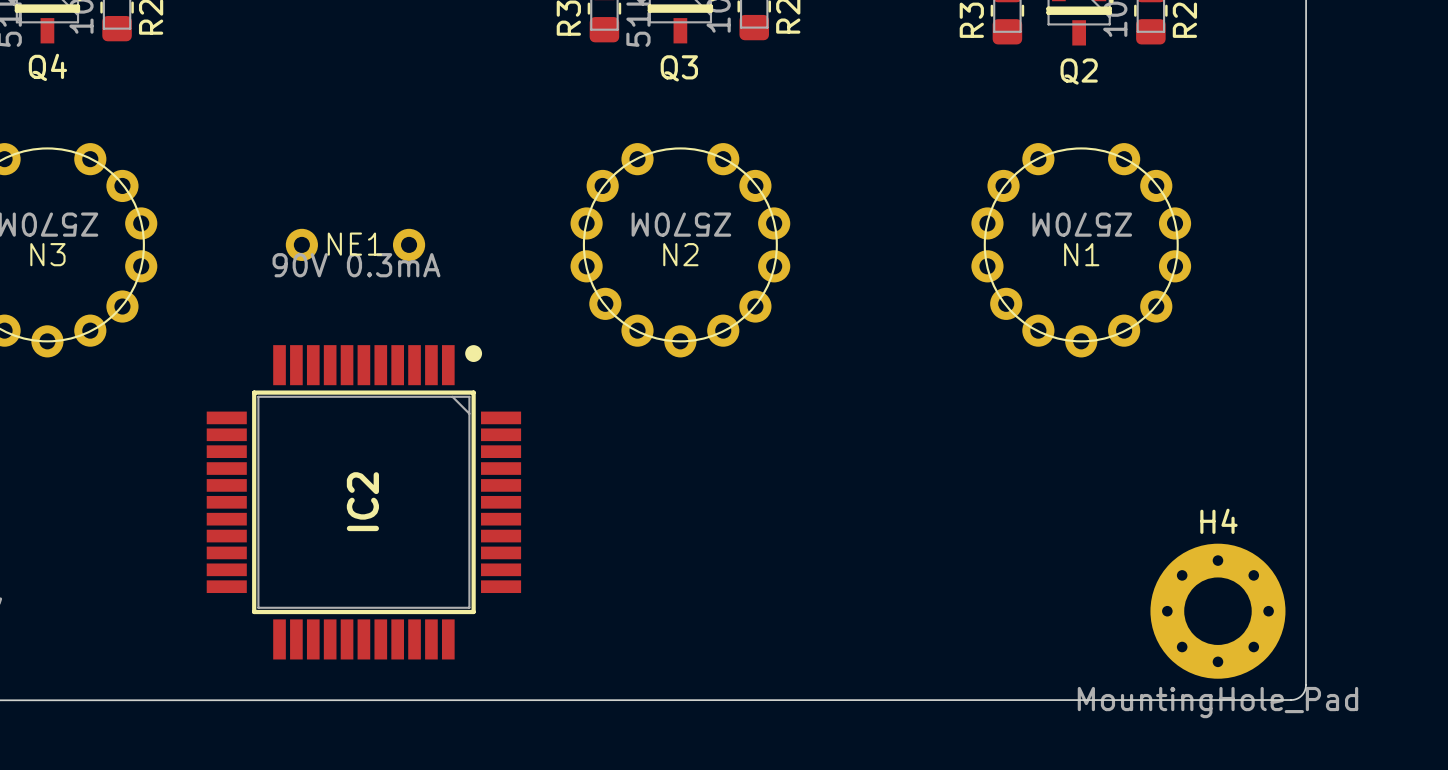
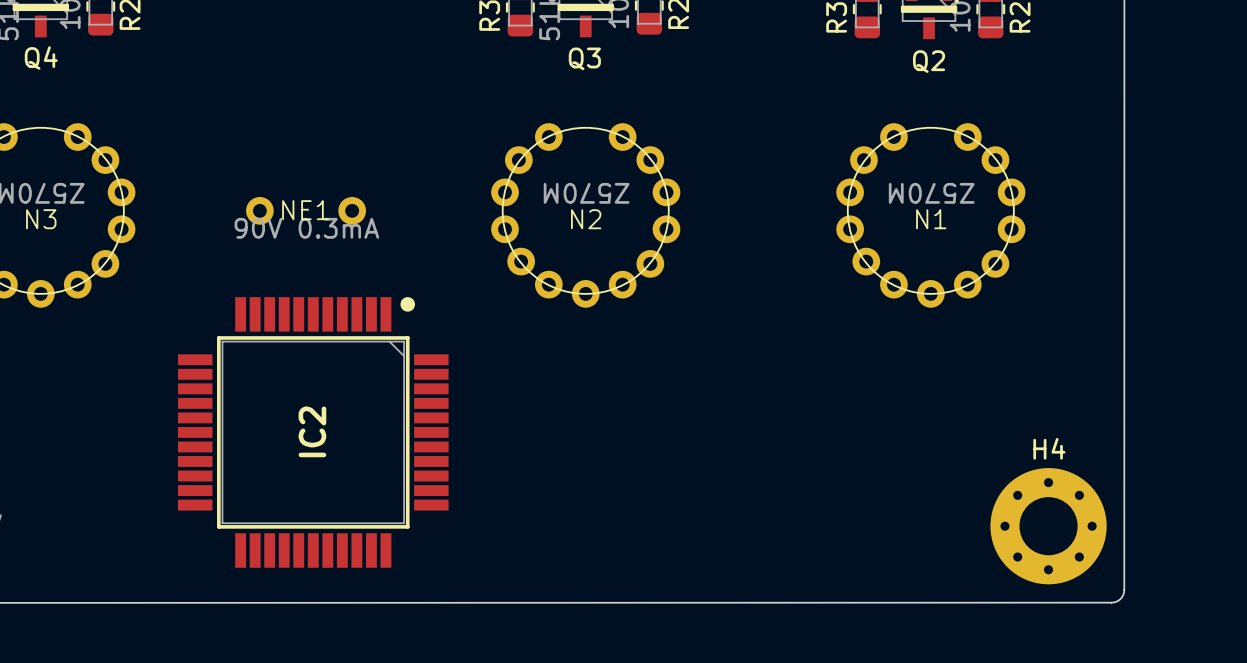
H4 value: MountingHole_Pad (1217, 702) -> none

